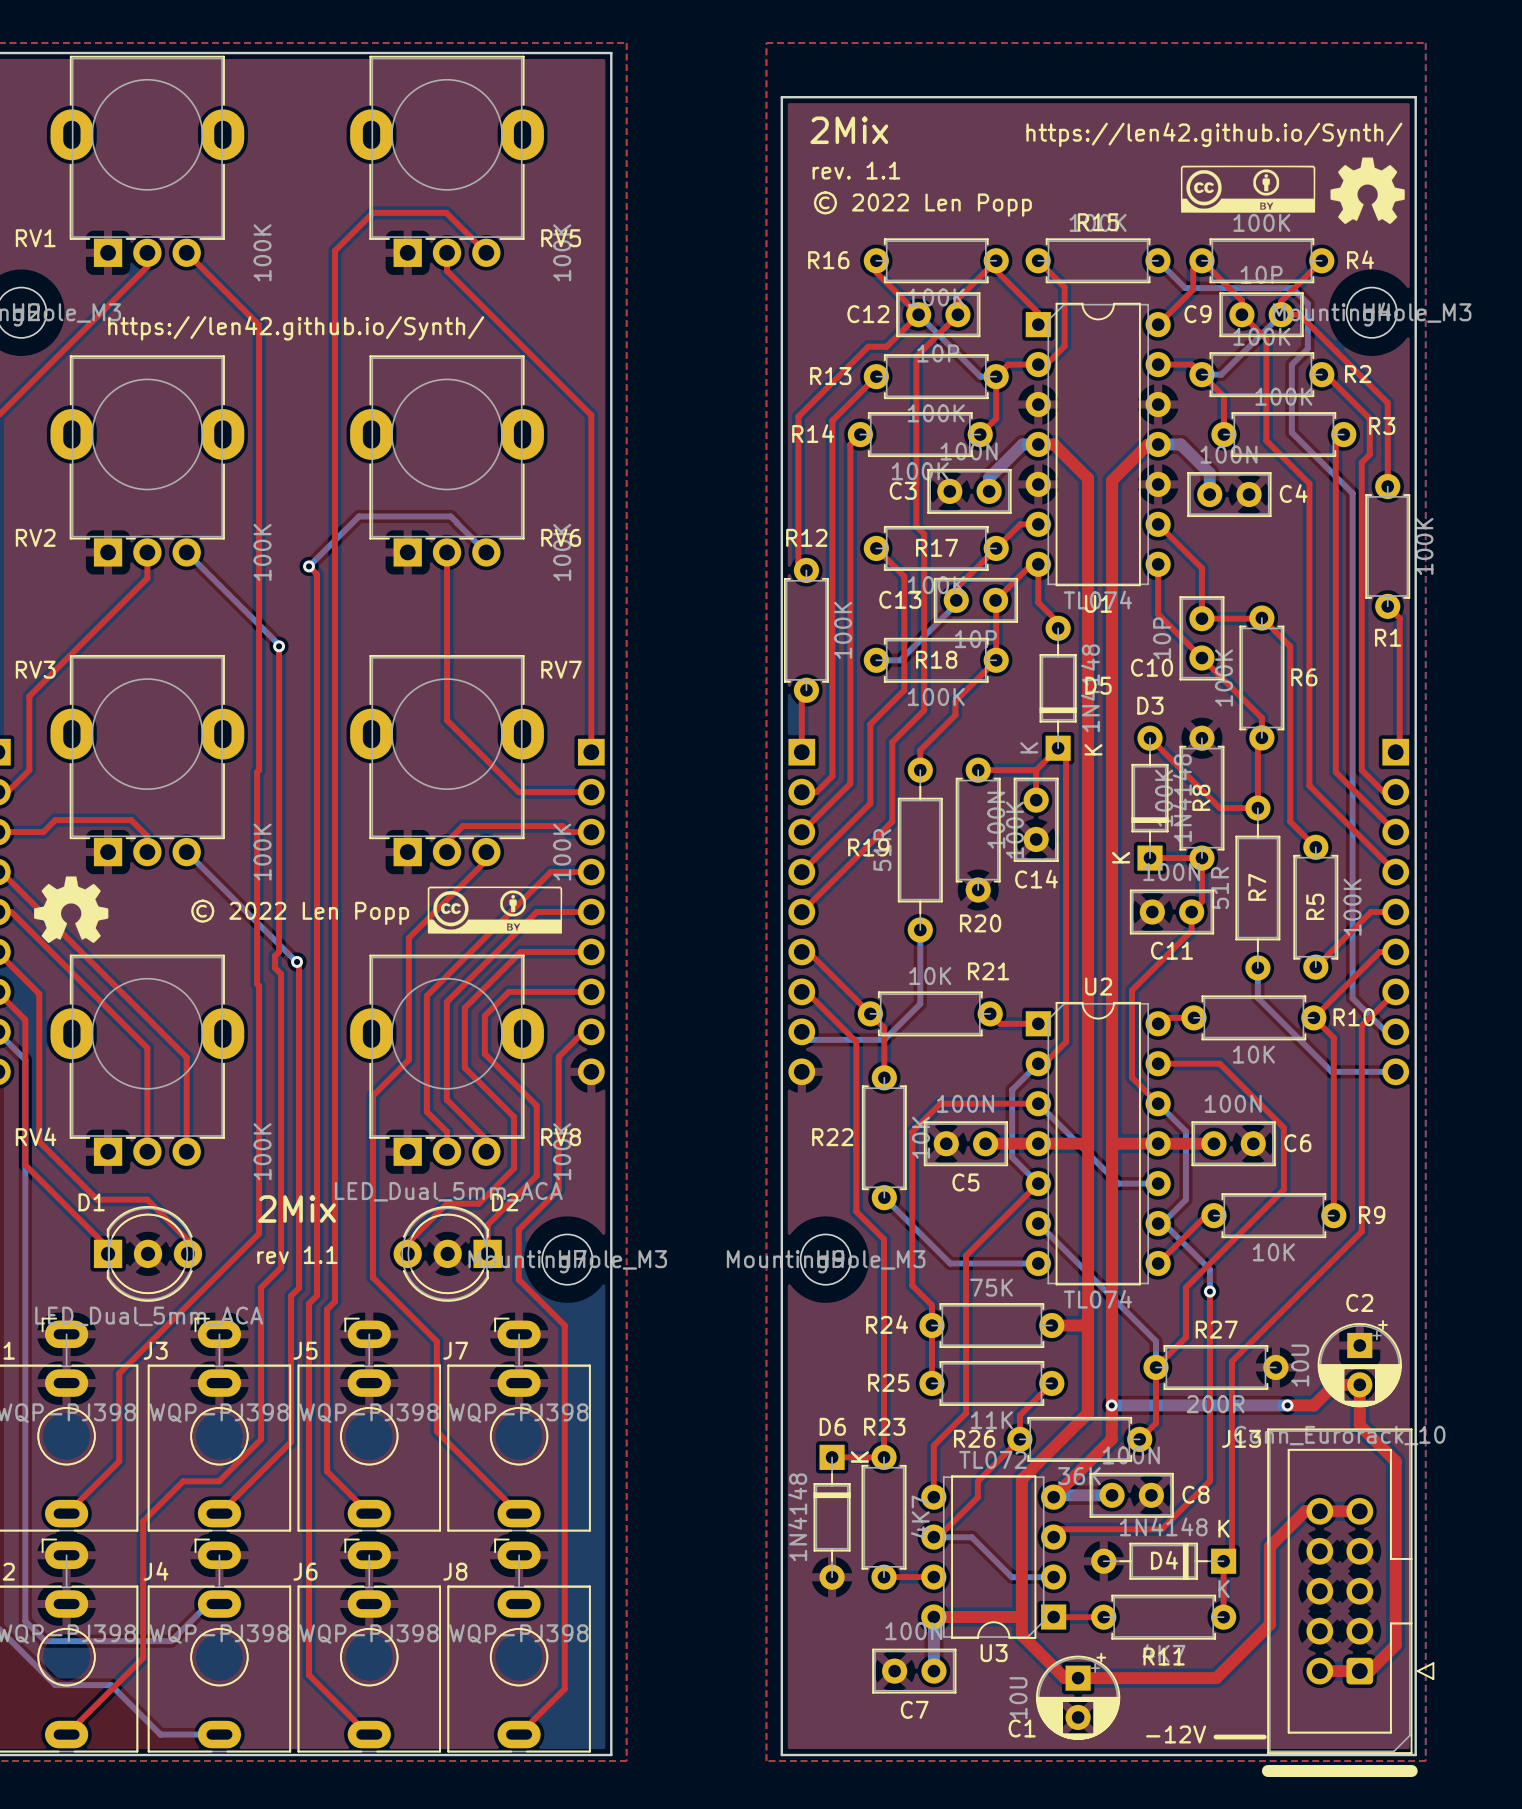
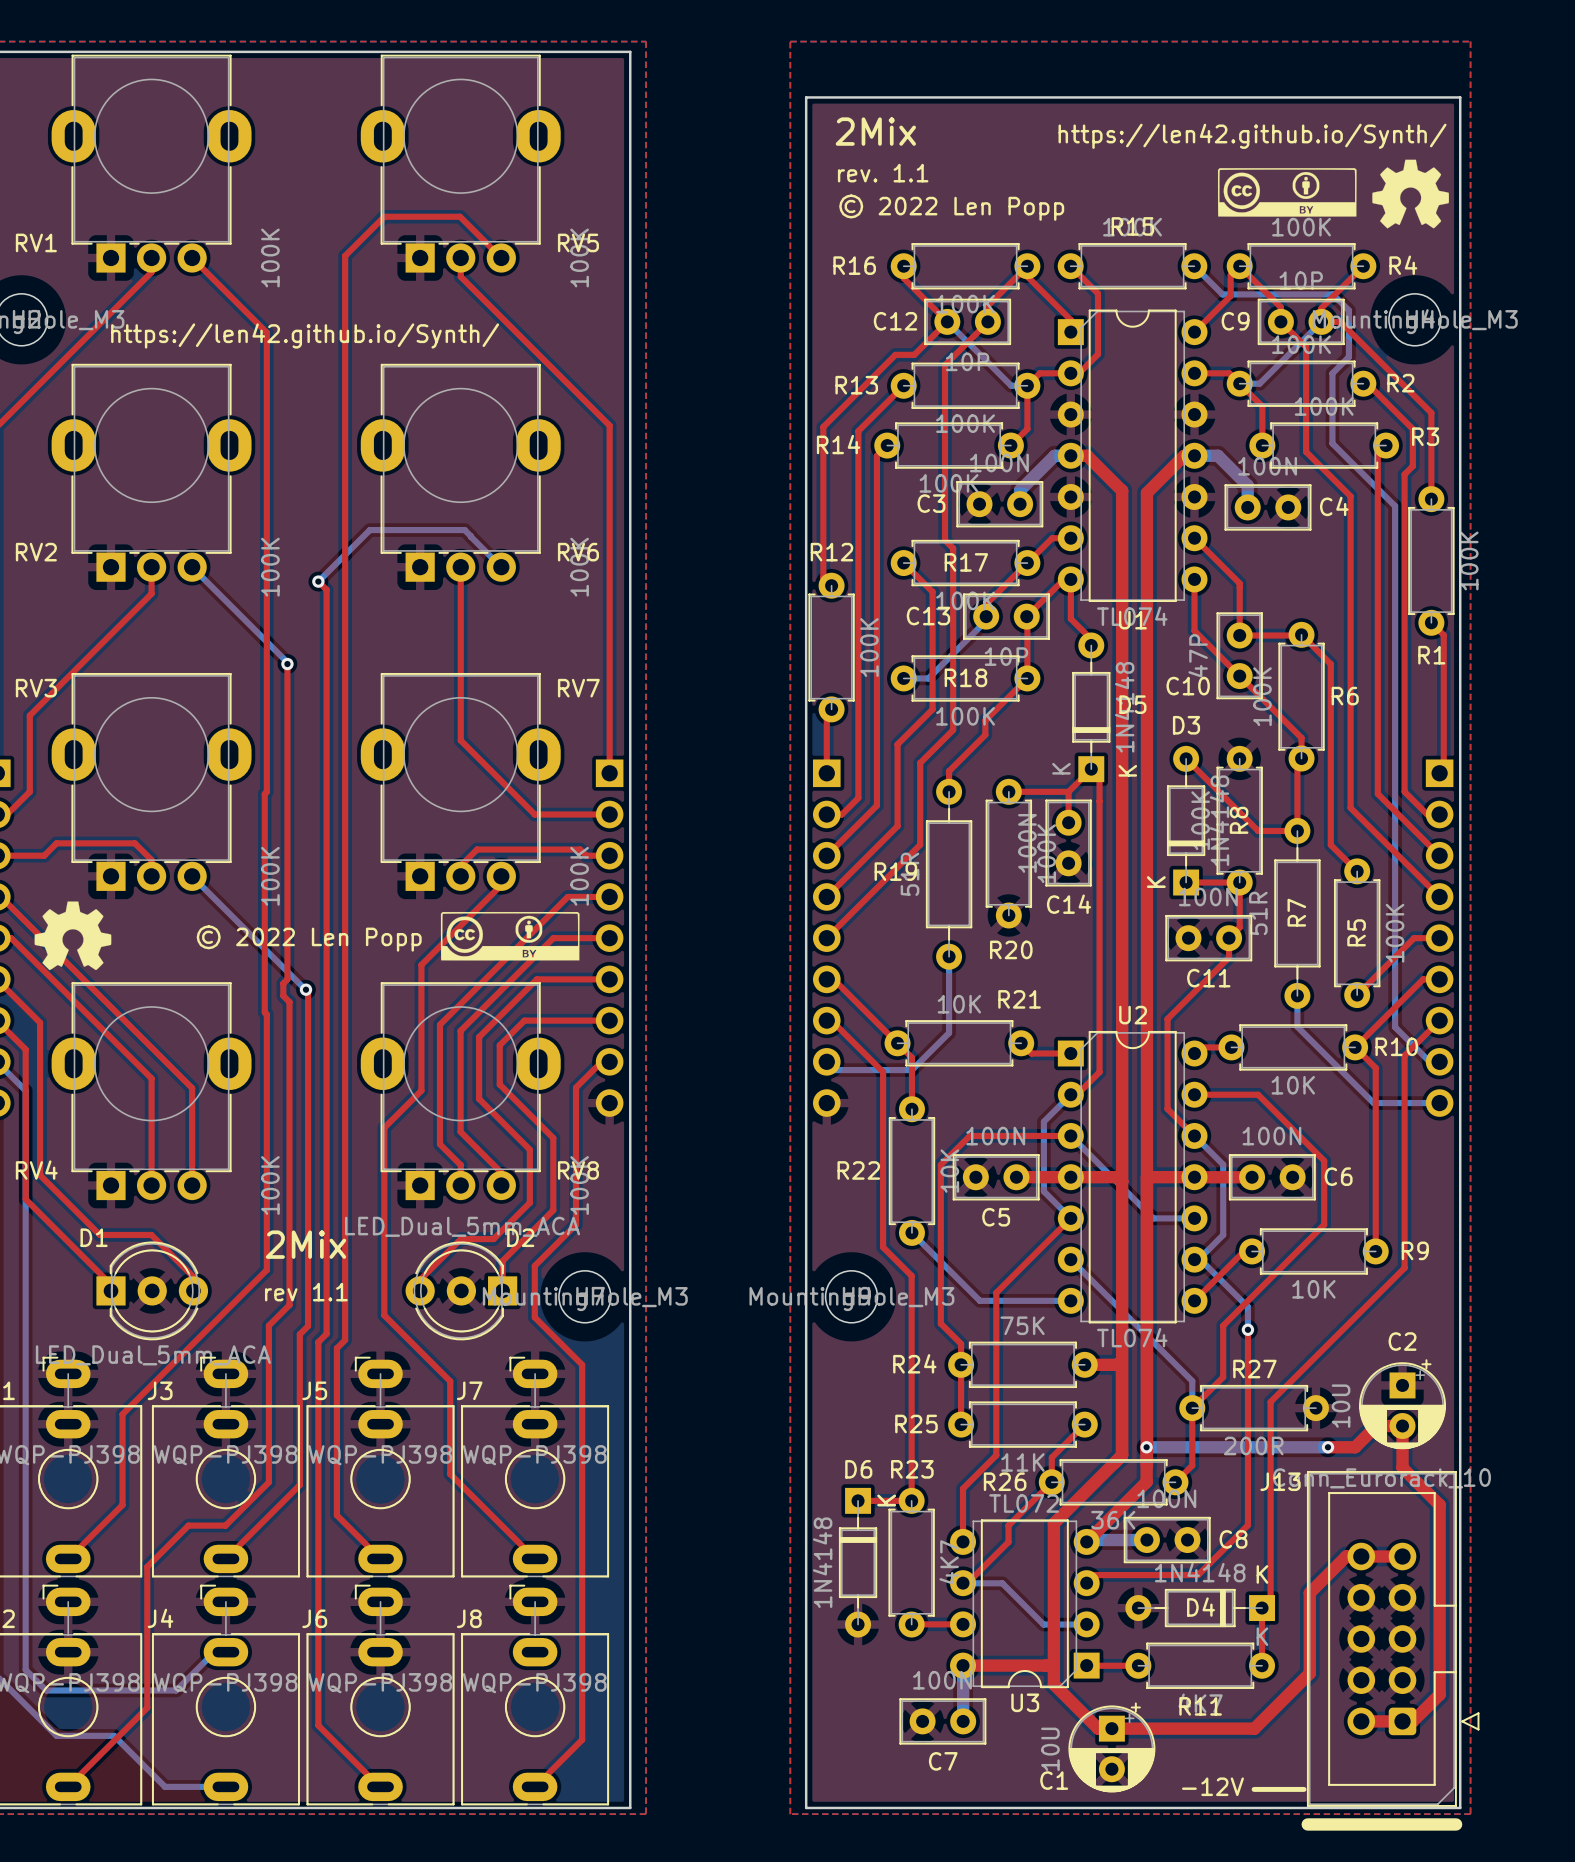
C10 value: 10P (1162, 638) -> 47P (1198, 655)

